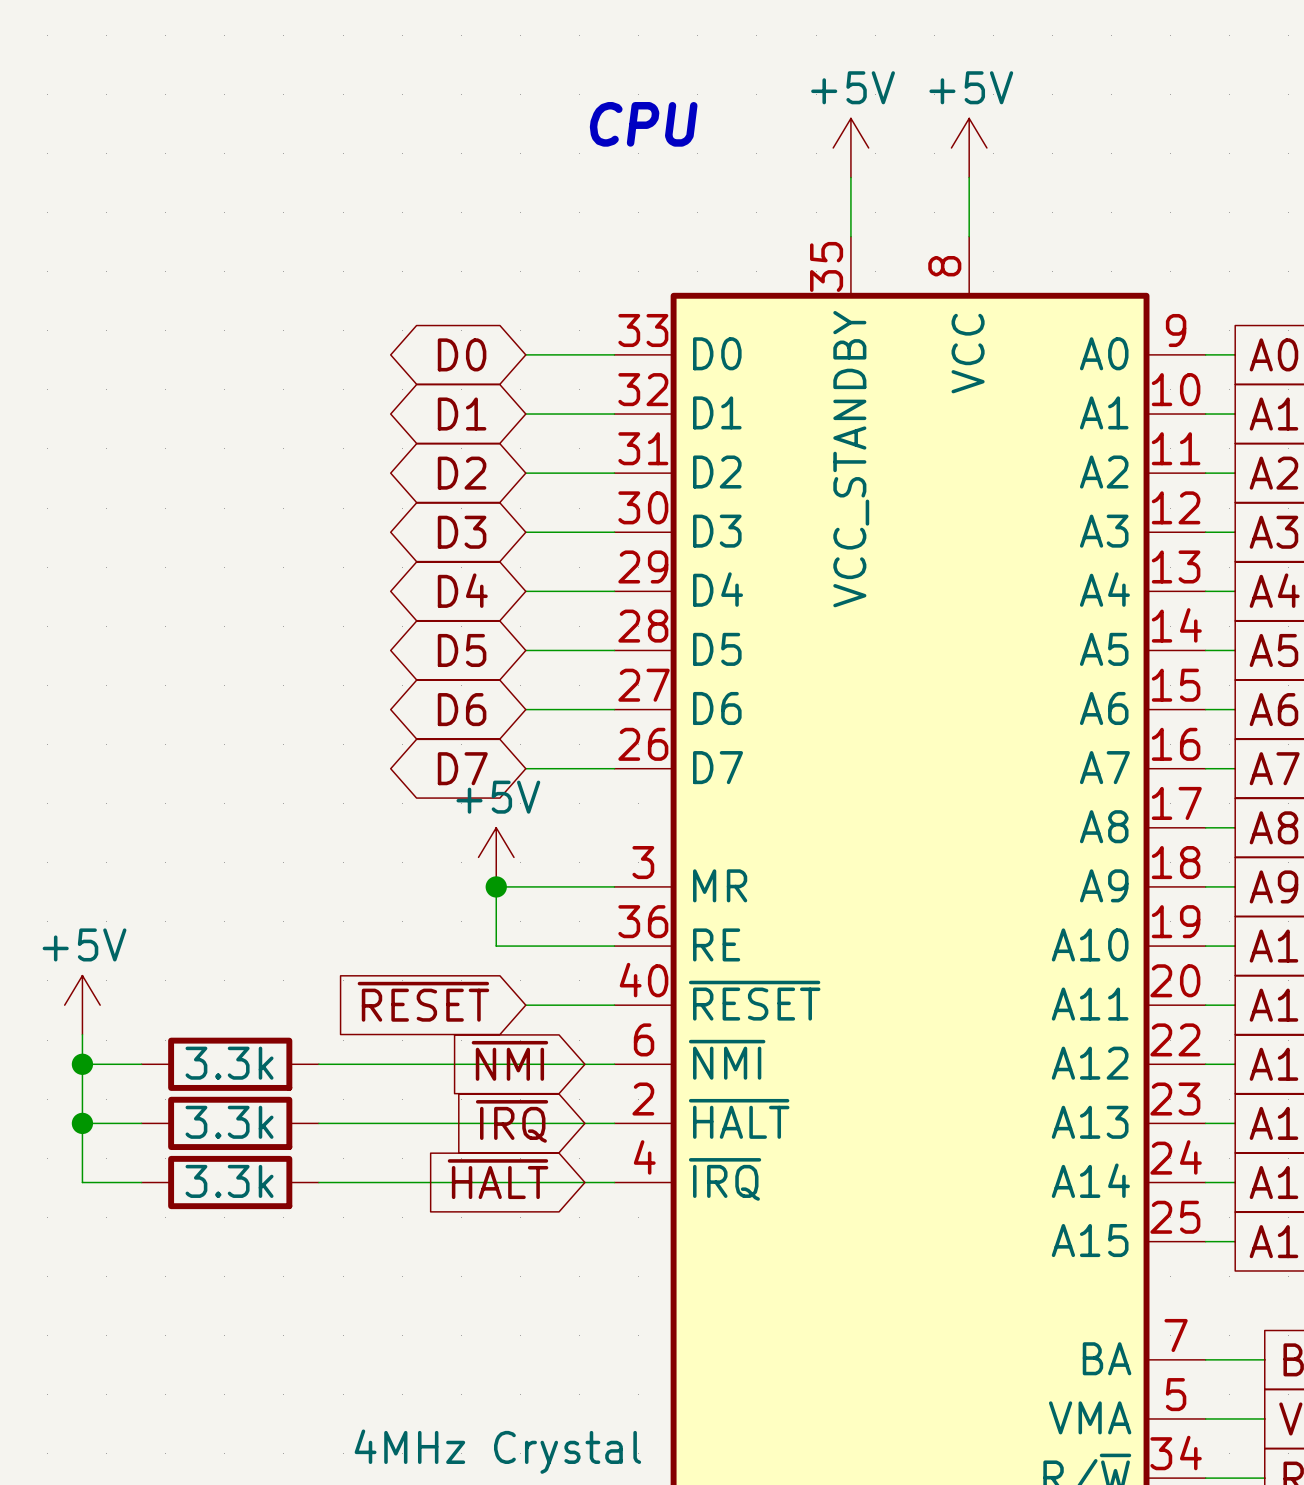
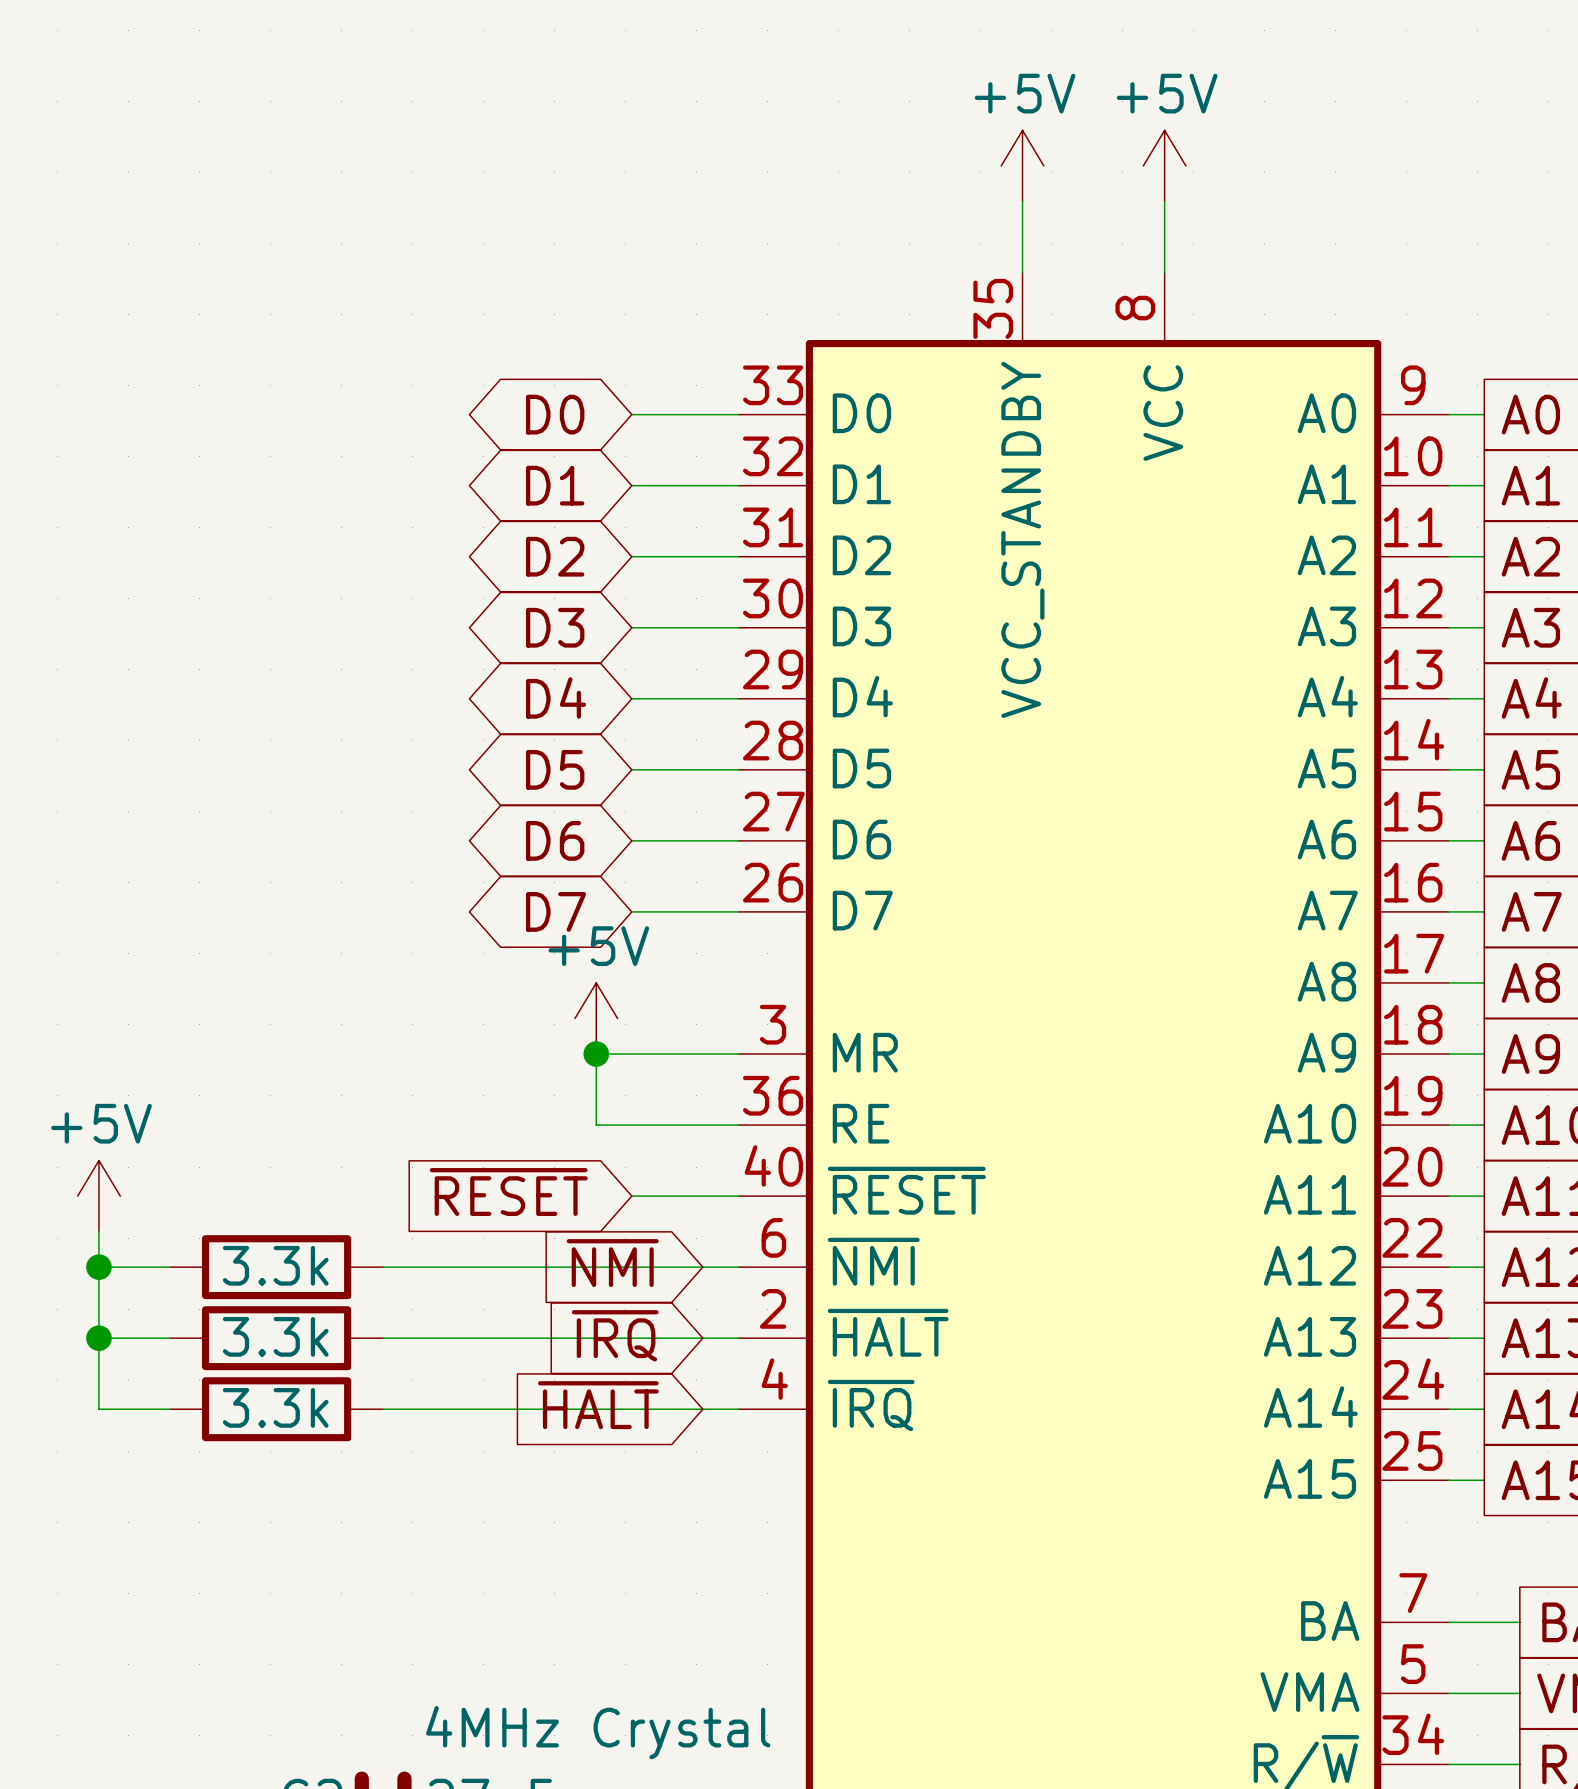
text: CPU (643, 124) -> none

